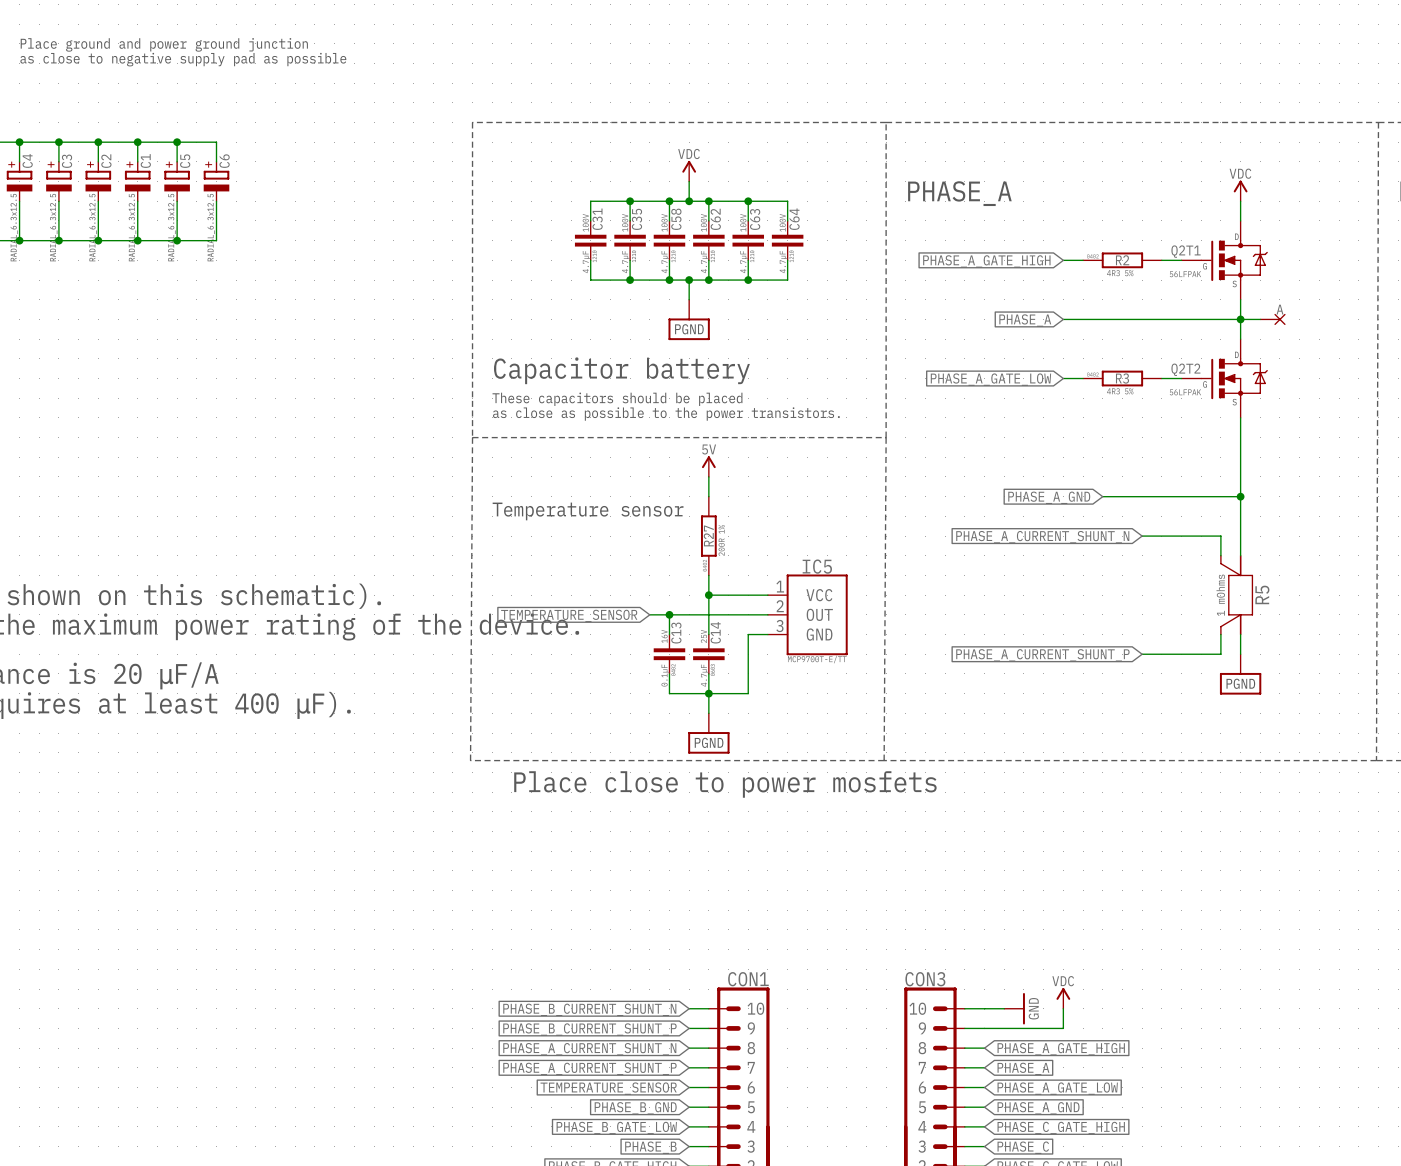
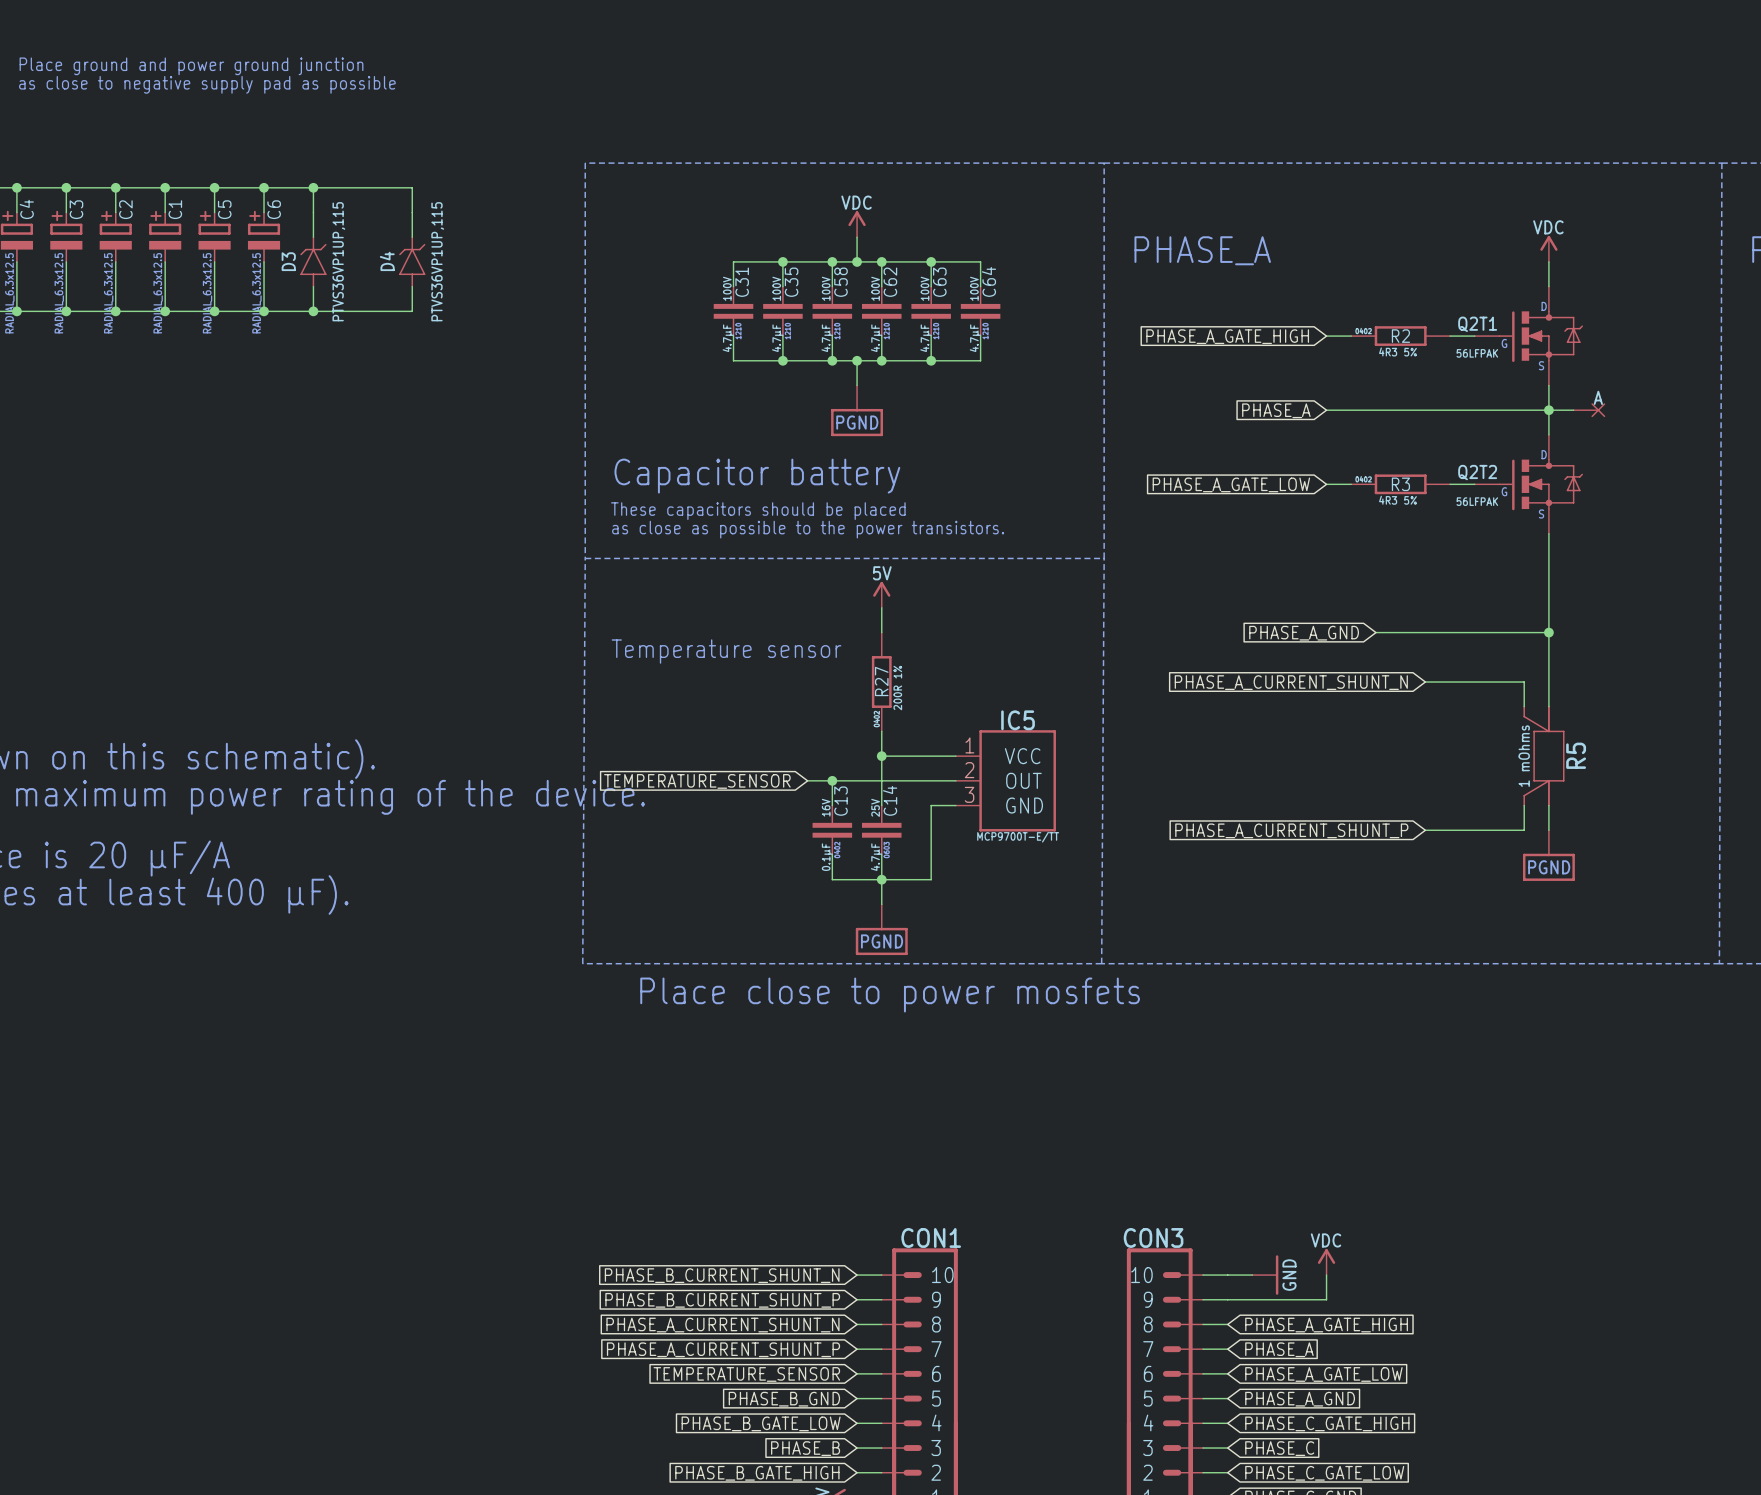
wire: none -> (264, 187) (412, 187) (412, 237)
junction: none -> (264, 187)
wire: none -> (313, 187) (313, 237)
junction: none -> (313, 187)
D3: none -> (313, 261)
D4: none -> (412, 261)
wire: none -> (313, 286) (313, 311)
wire: none -> (412, 286) (412, 311) (264, 311)
junction: none -> (264, 311)
junction: none -> (313, 311)

